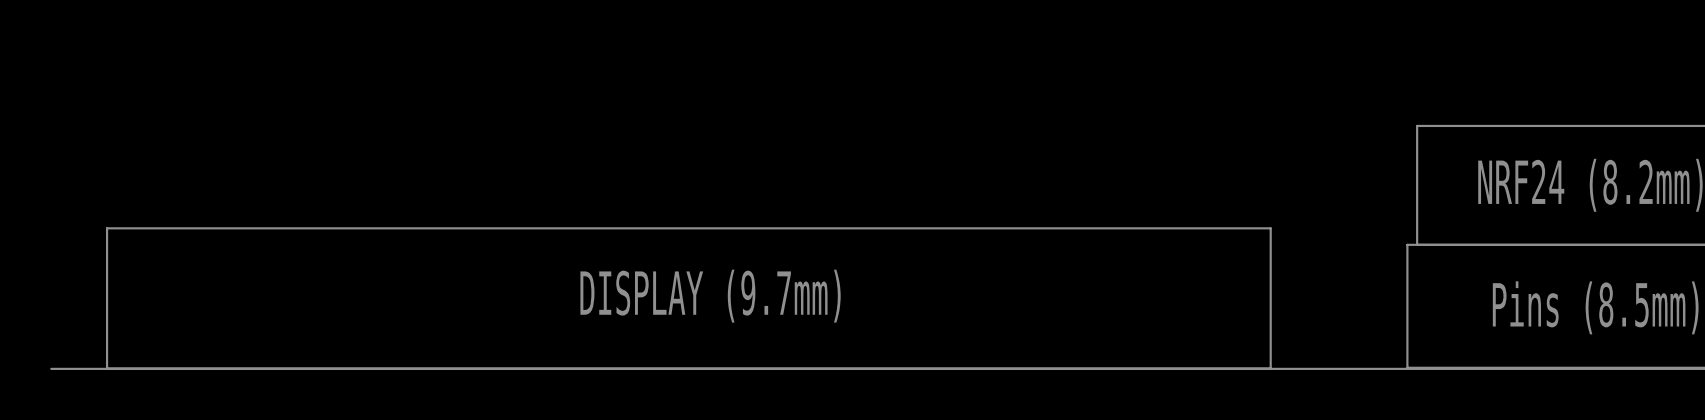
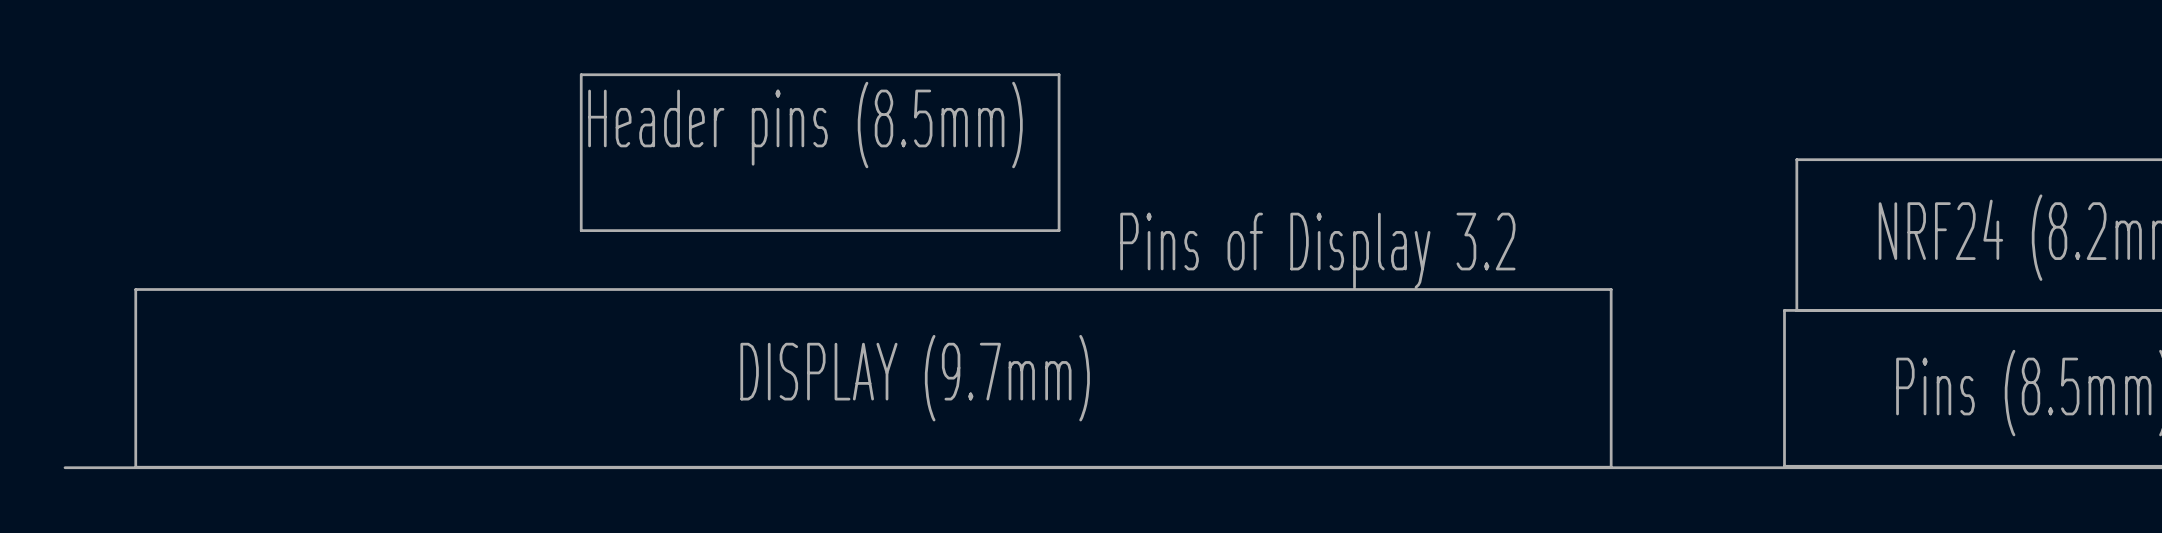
line: none -> (581, 74) (1059, 74) (1059, 230) (581, 230) (581, 74)
text: none -> Header pins (8.5mm) (805, 125)
text: none -> Pins of Display 3.2 (1317, 250)

